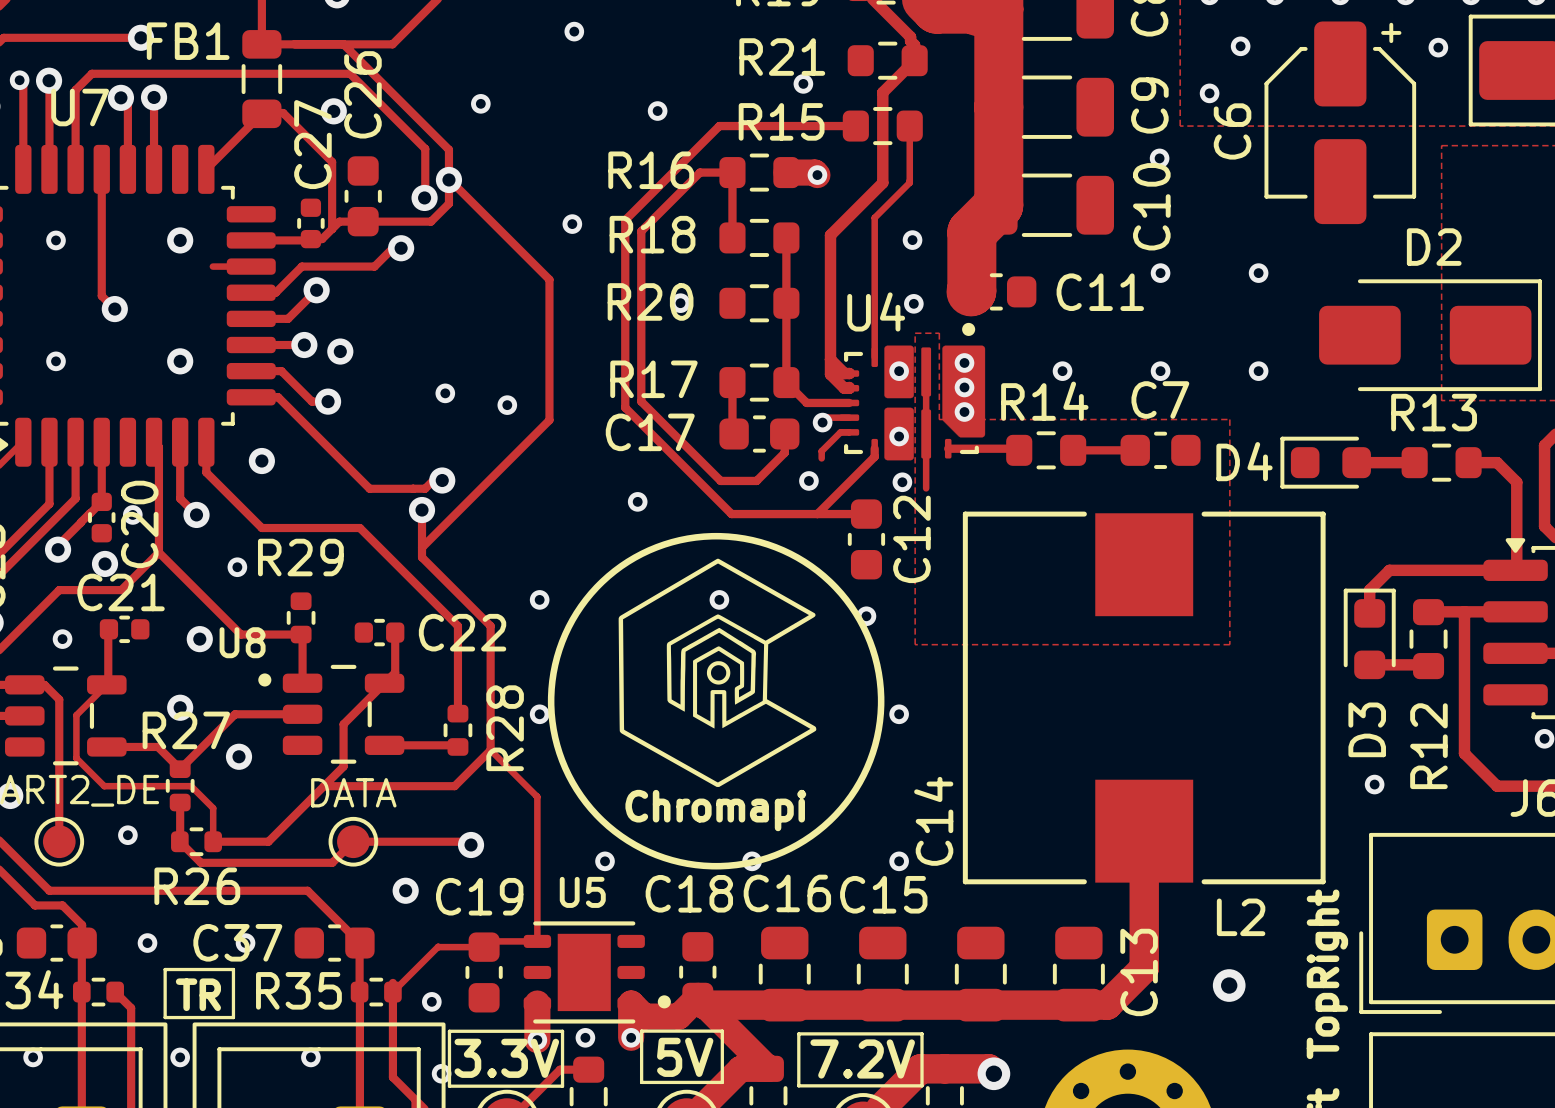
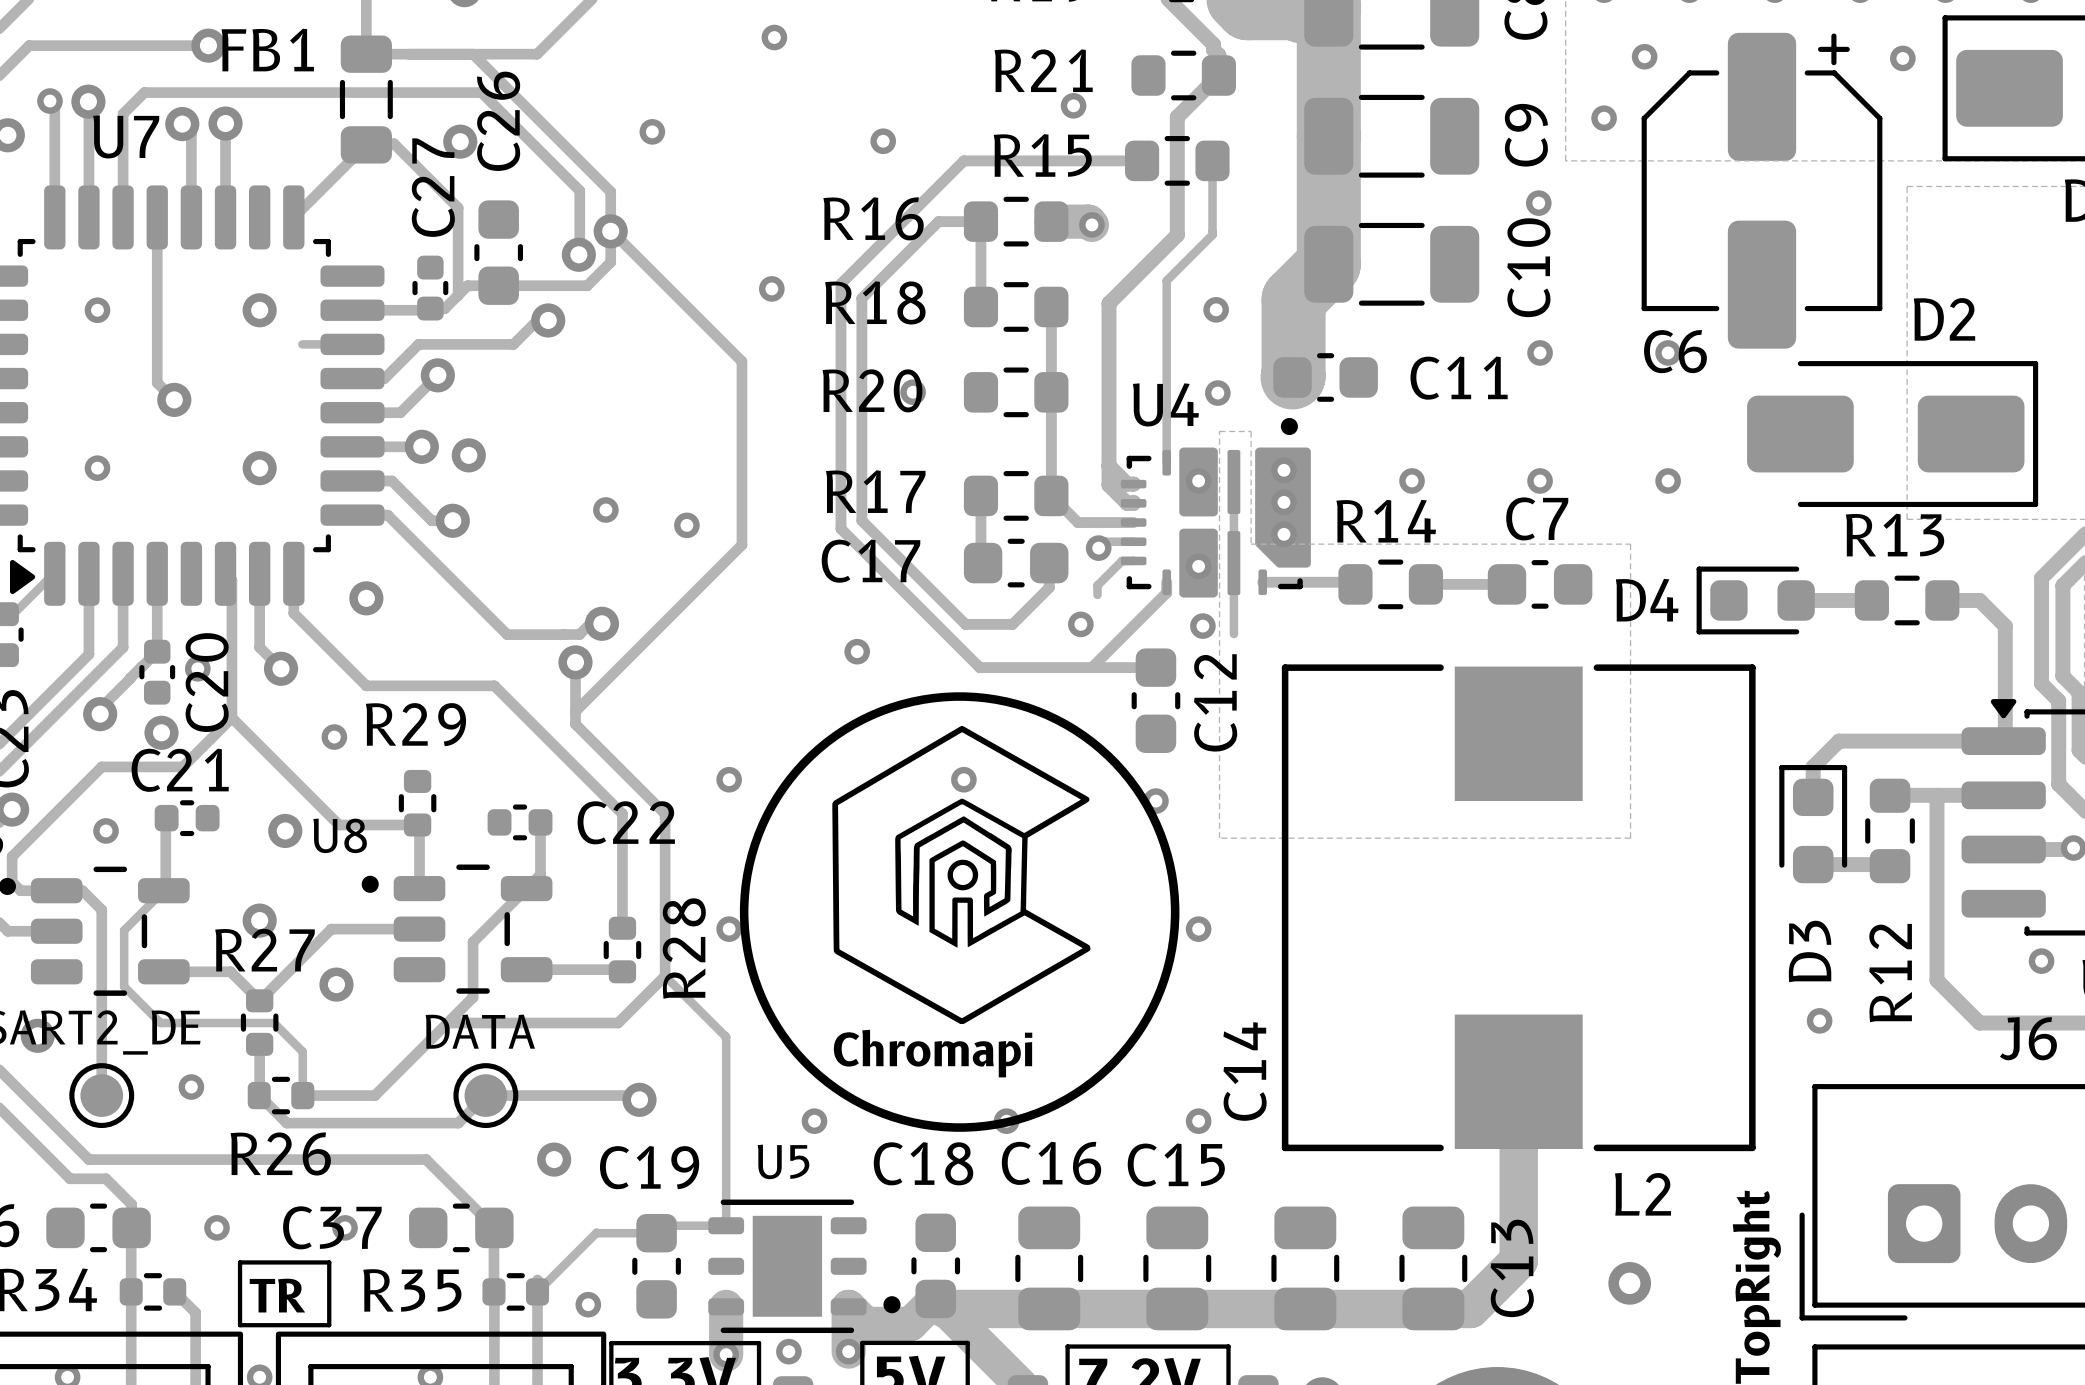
C6 footprint: [1264, 21, 1417, 225] -> [1641, 32, 1883, 349]
C6 name position: C6 (1232, 131) -> C6 (1675, 351)
D2 name position: D2 (1434, 247) -> D2 (1944, 319)

